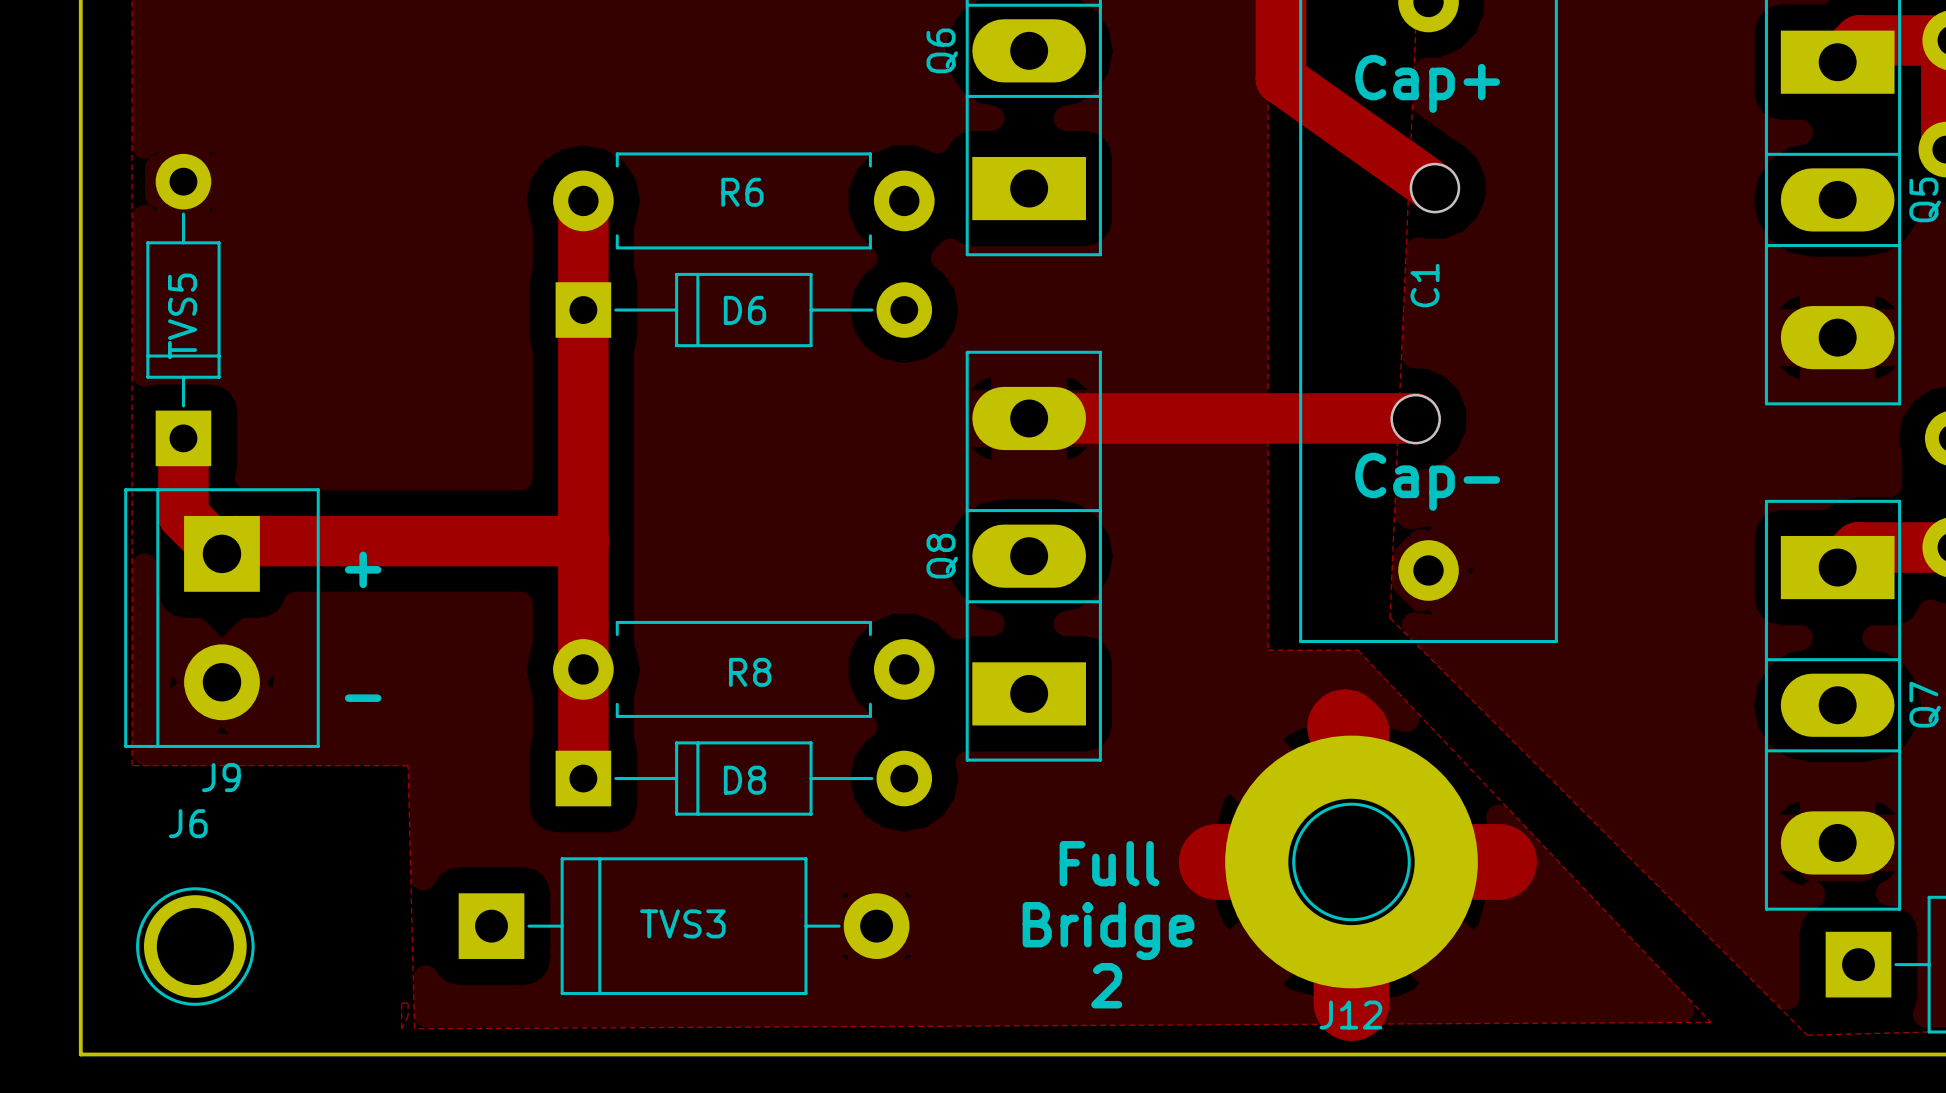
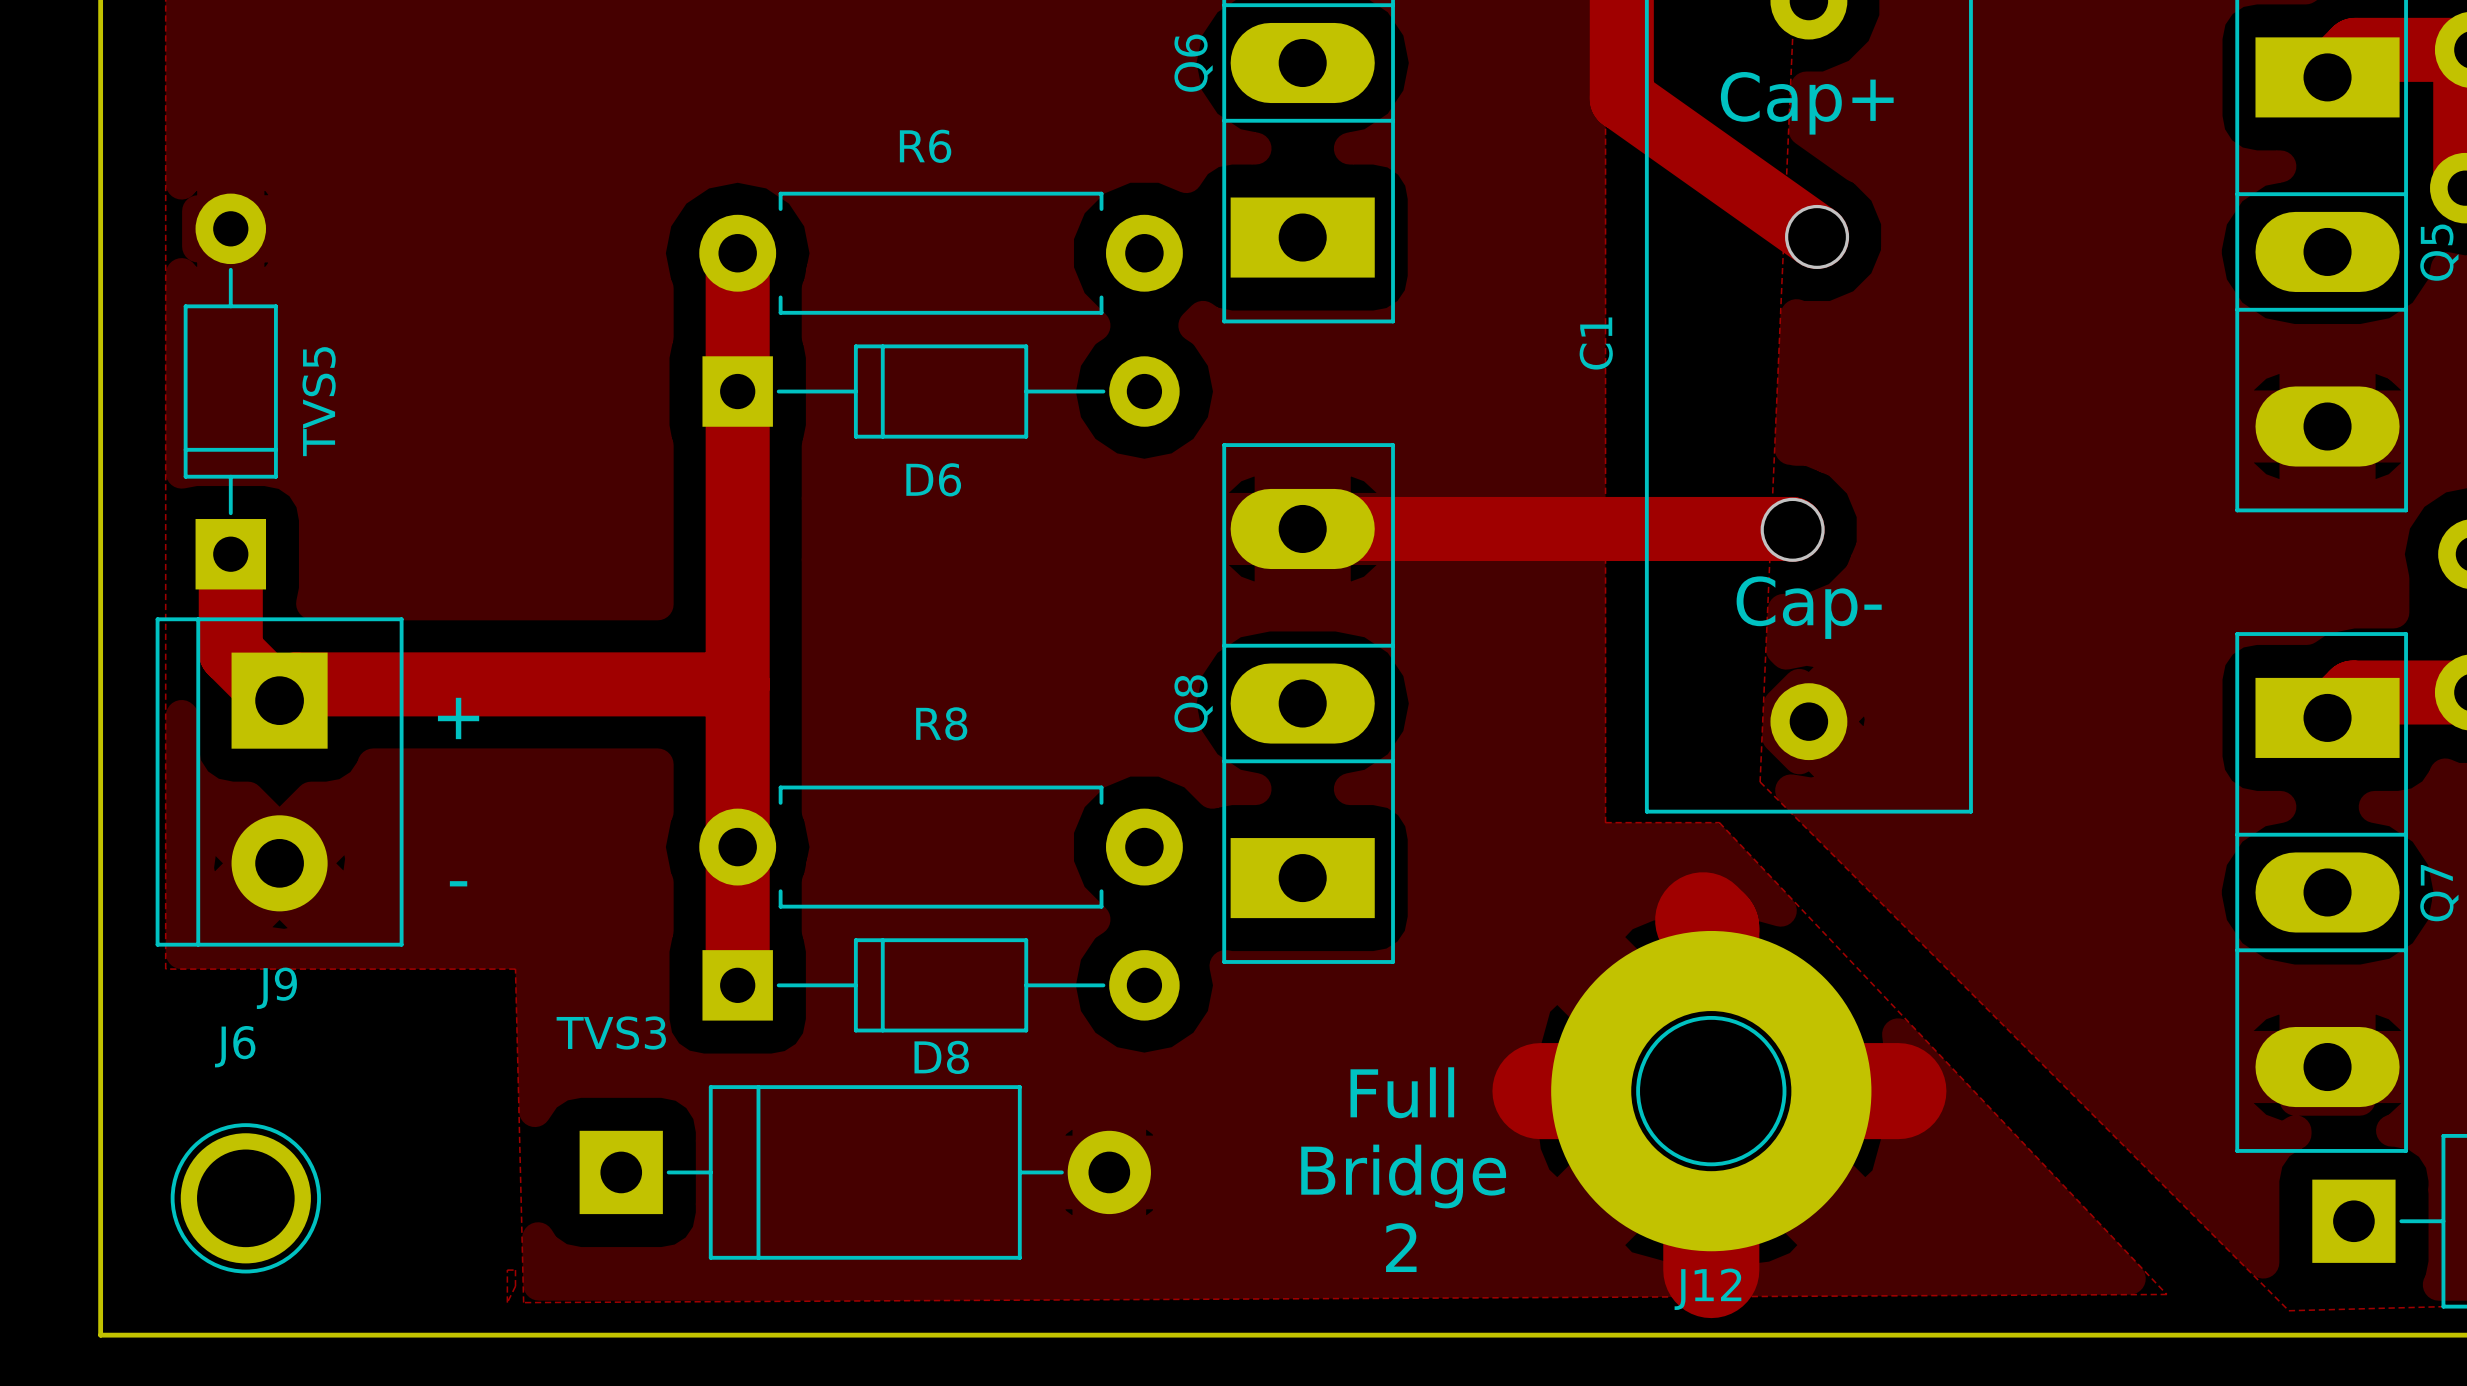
R6 name position: R6 (742, 192) -> R6 (925, 146)
C1 name position: C1 (1425, 285) -> C1 (1596, 343)
D6 name position: D6 (744, 310) -> D6 (933, 479)
TVS5 name position: TVS5 (182, 316) -> TVS5 (319, 401)
R8 name position: R8 (750, 672) -> R8 (941, 723)
D8 name position: D8 (744, 780) -> D8 (941, 1057)
TVS3 name position: TVS3 (682, 923) -> TVS3 (611, 1032)

